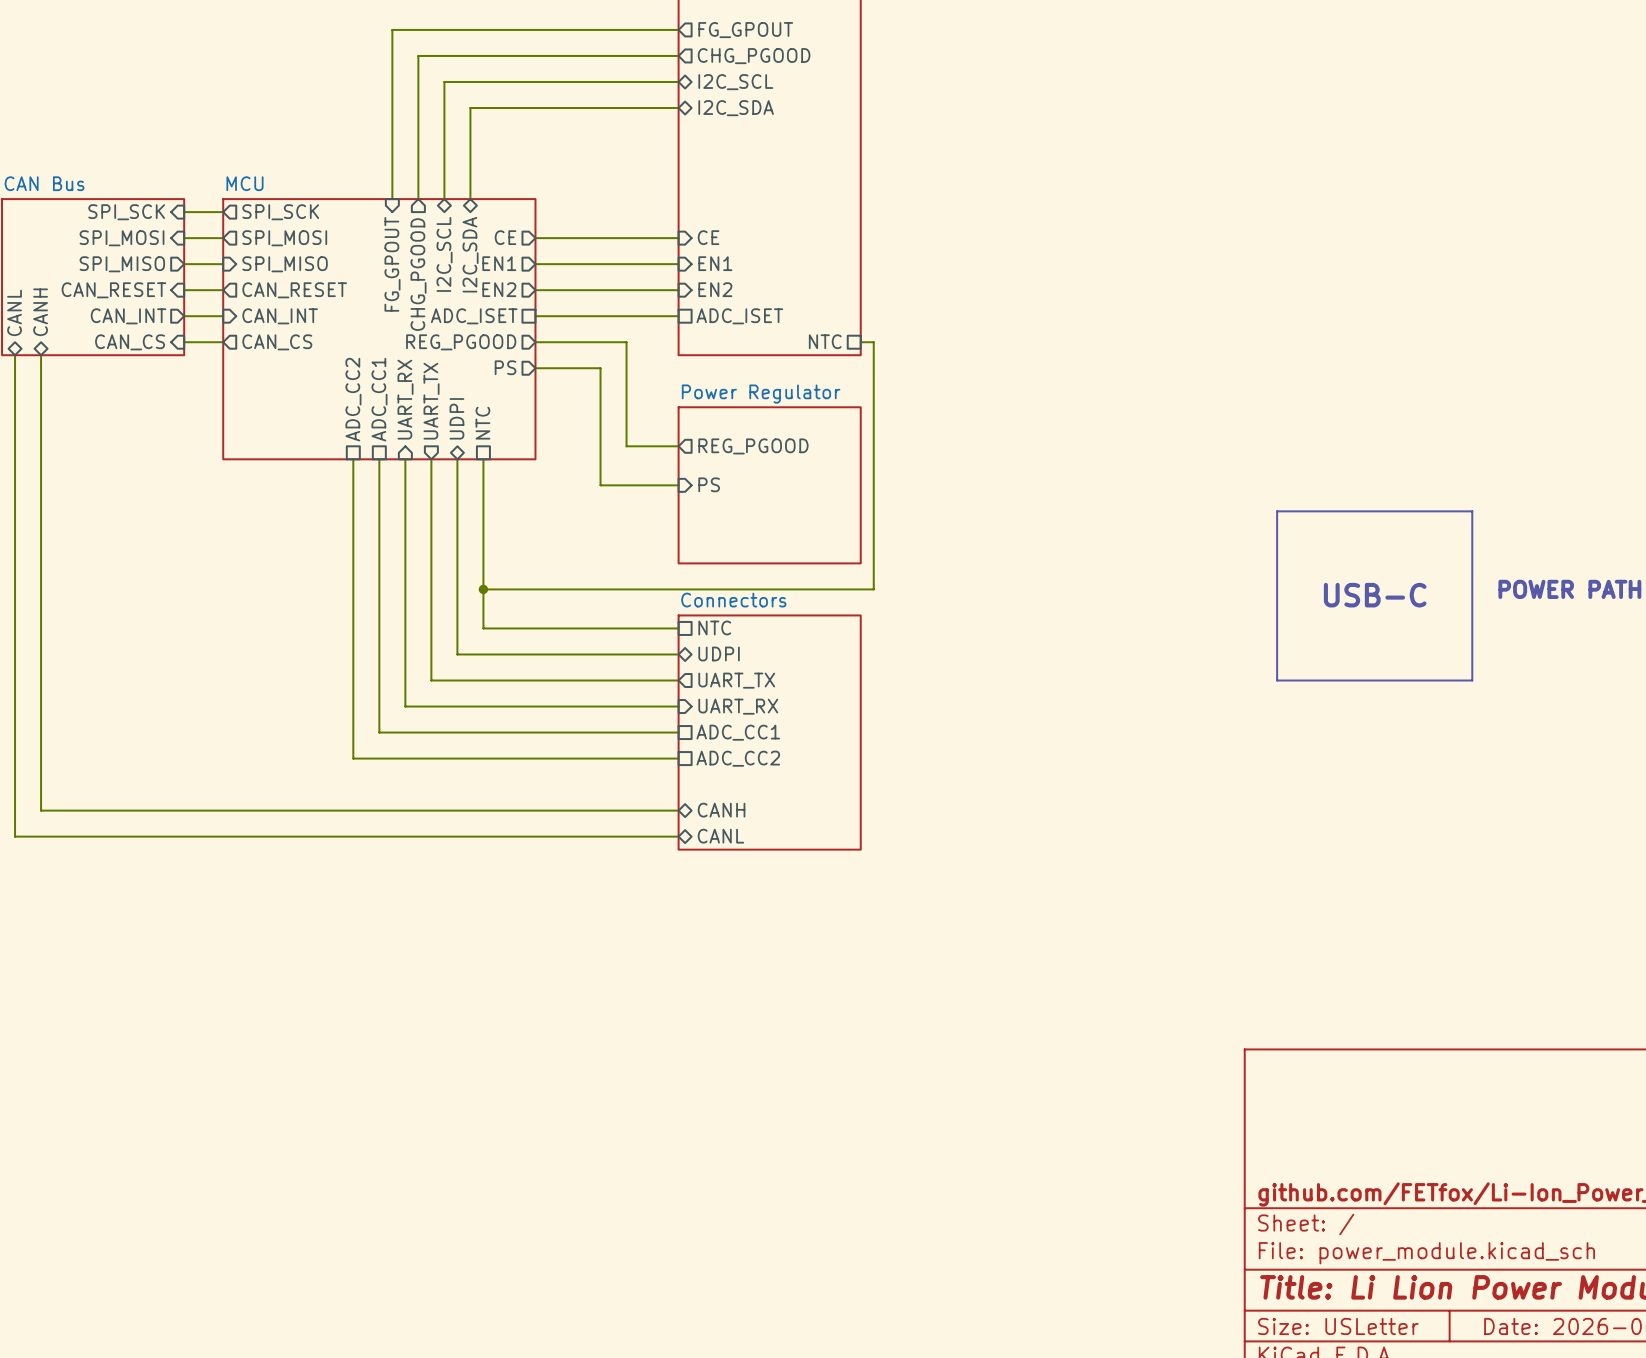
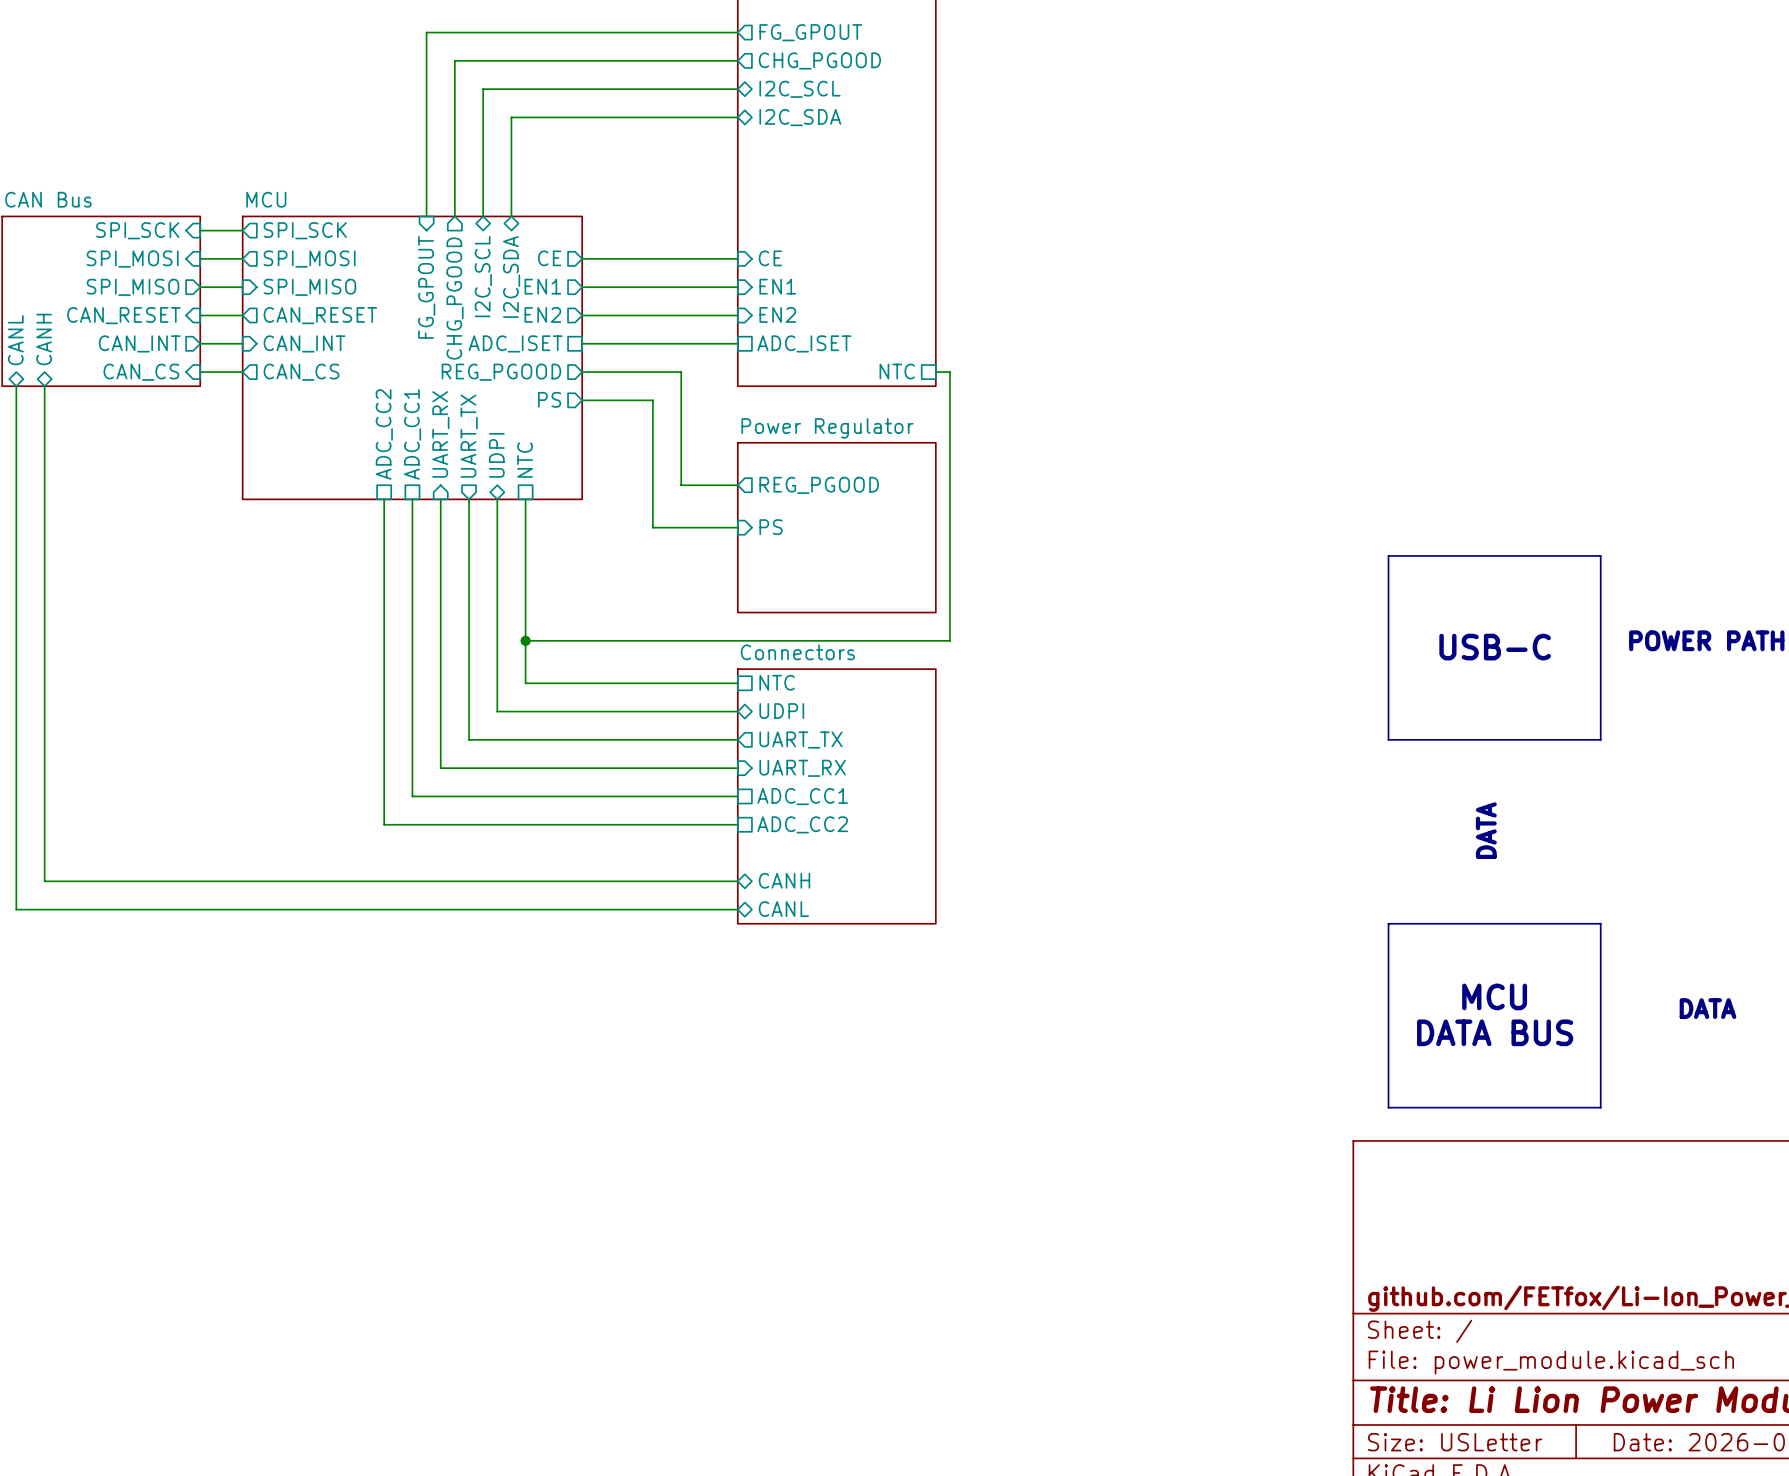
text: none -> DATA (1486, 830)
line: none -> (1388, 923) (1600, 923) (1600, 1107) (1388, 1107) (1388, 923)
text: none -> MCU (1494, 996)
text: none -> DATA (1707, 1008)
text: none -> DATA BUS (1495, 1032)

